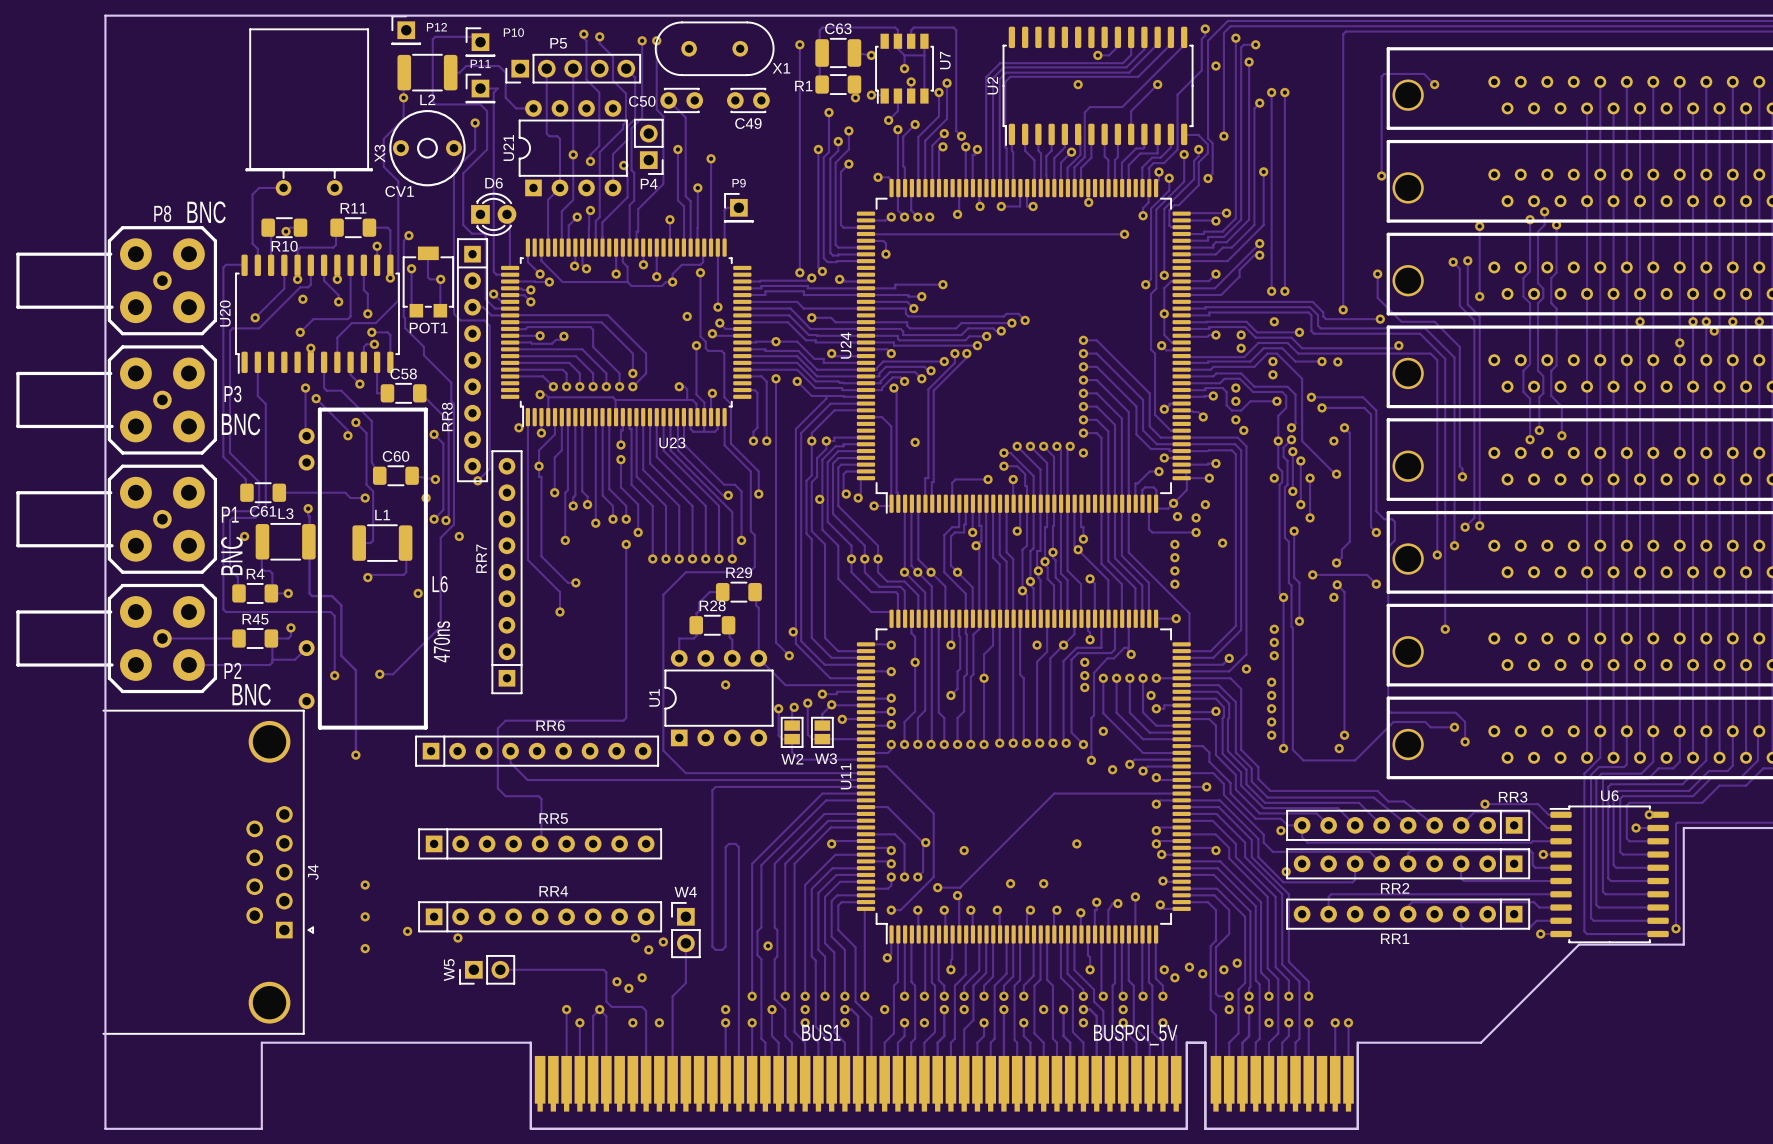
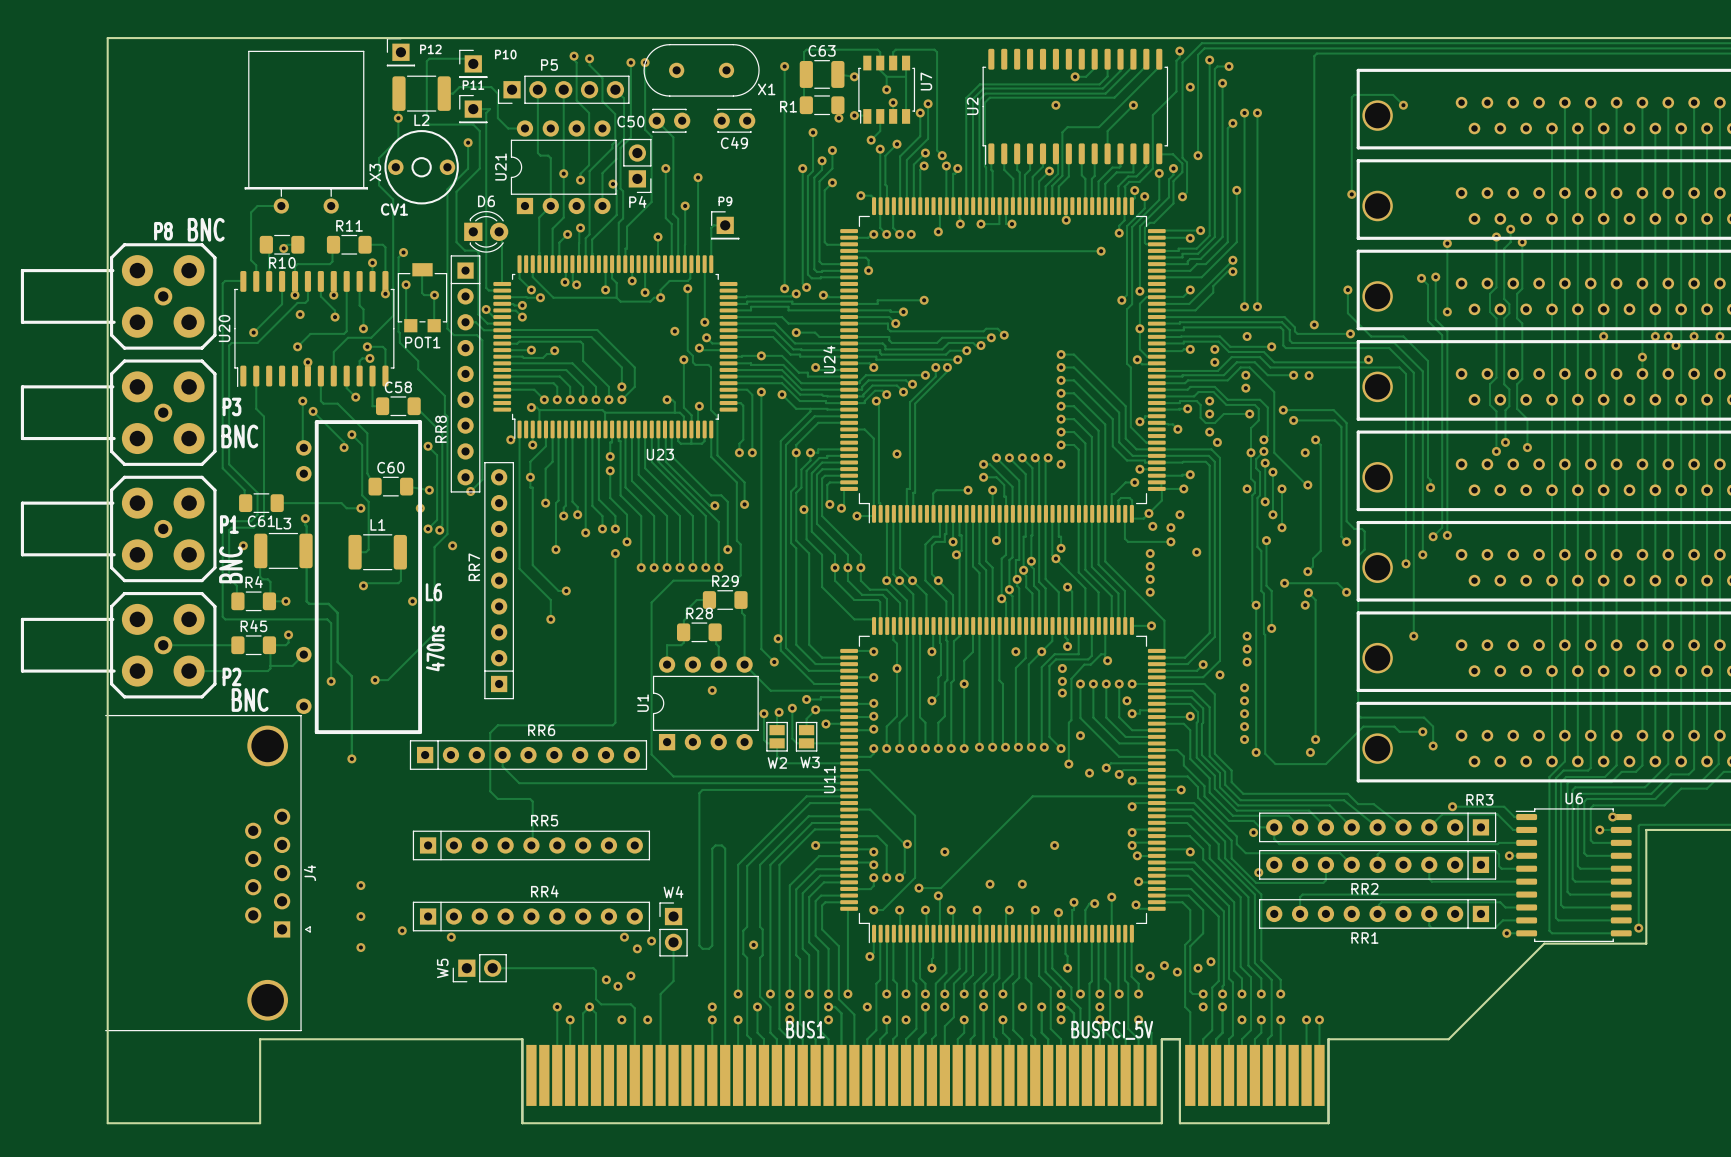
BUS1 footprint: [529, 1041, 1359, 1130] -> [521, 1038, 1330, 1125]

